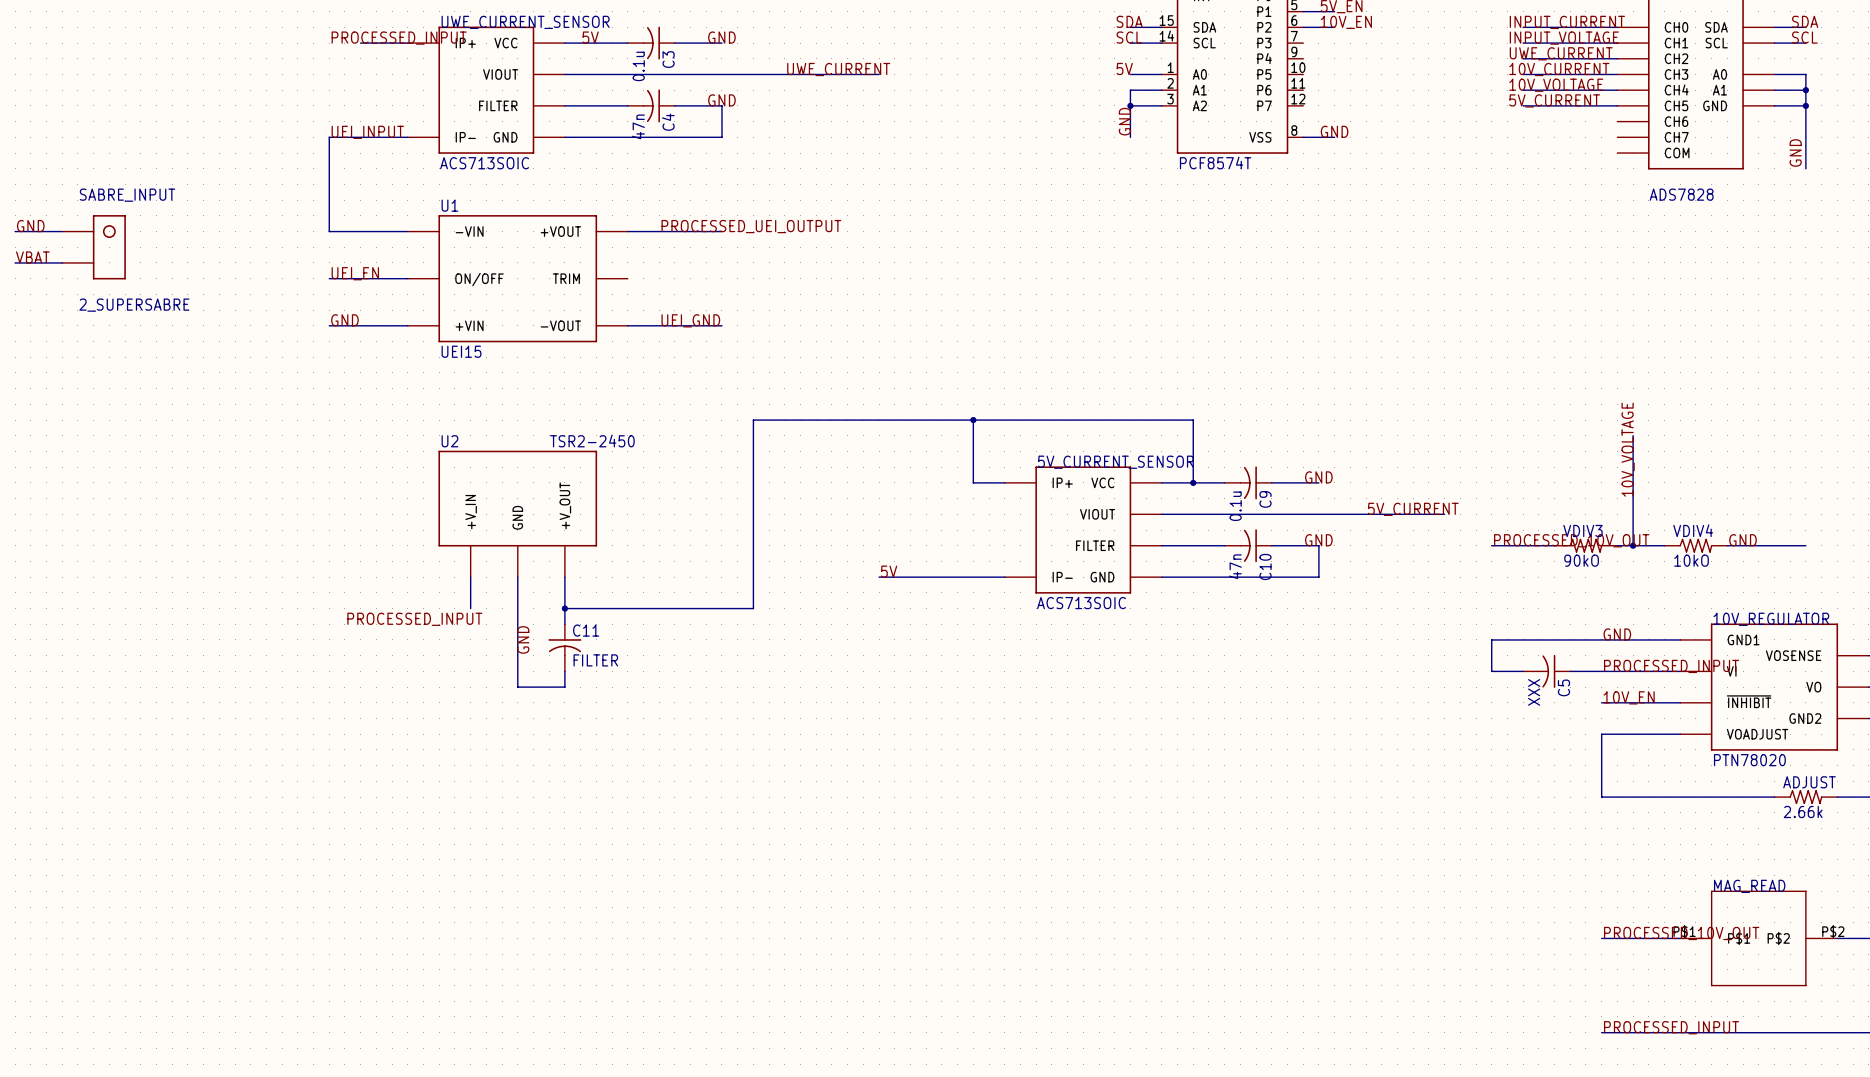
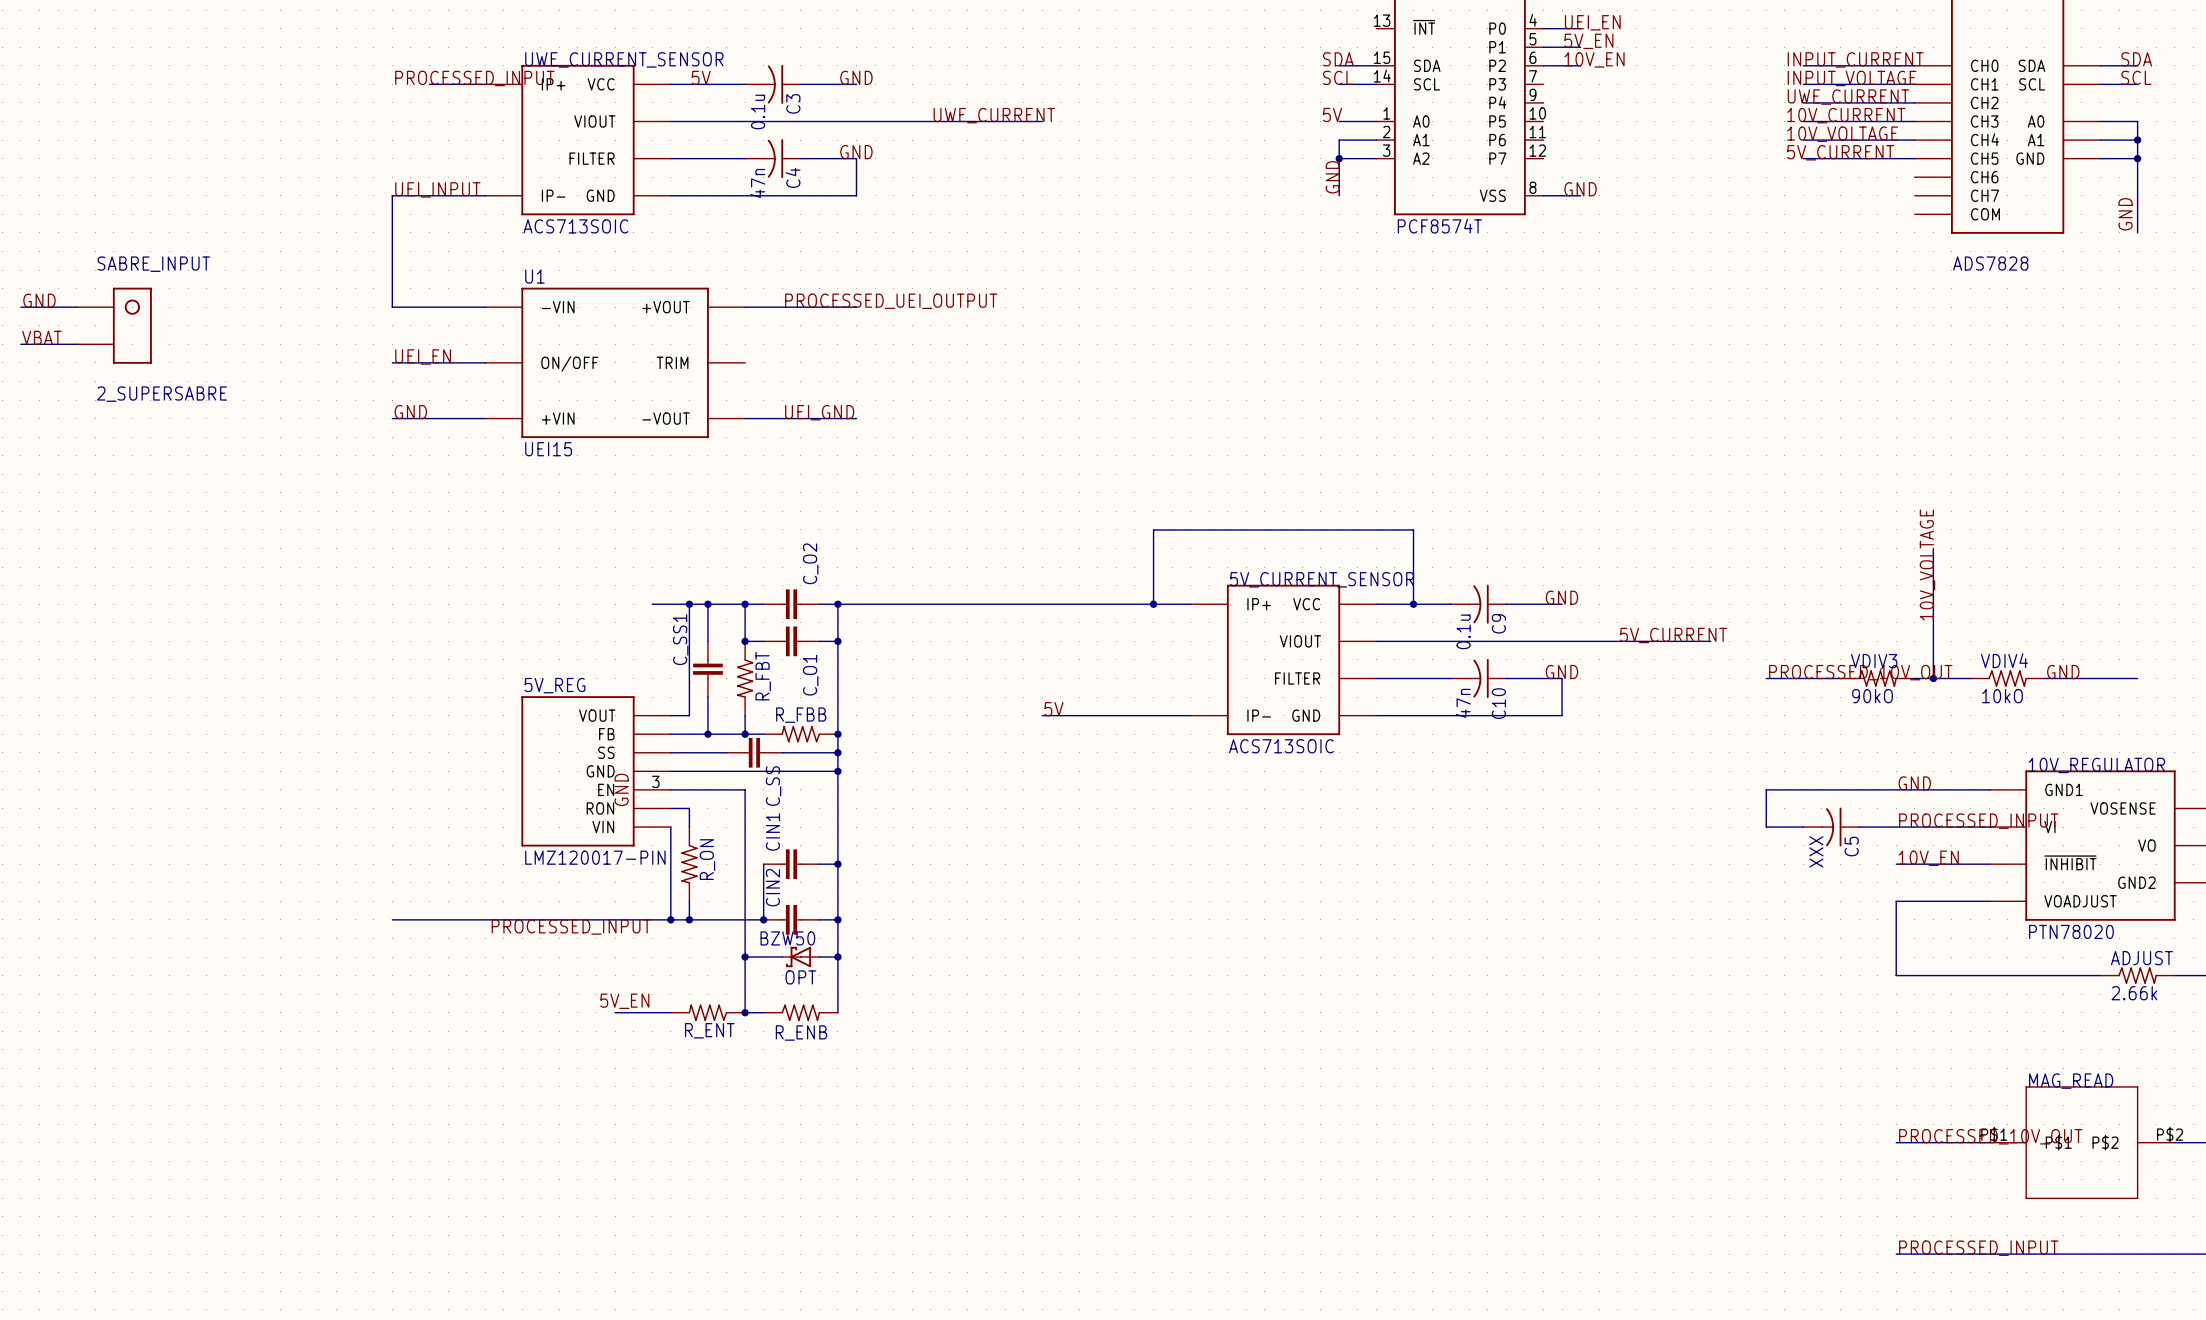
wire: (973, 420) (753, 420) (753, 608) (706, 608) -> none
junction: (973, 420) -> none
wire: none -> (652, 604) (763, 604)
junction: none -> (689, 604)
junction: none -> (707, 604)
wire: none -> (745, 604) (745, 641) (763, 641)
junction: none -> (745, 604)
C_O2: none -> (791, 604)
wire: none -> (819, 604) (1153, 604)
wire: none -> (837, 604) (837, 1012)
junction: none -> (837, 604)
junction: none -> (1153, 604)
U2: TSR2-2450 (517, 513) -> none
junction: none -> (745, 641)
C_O1: none -> (791, 641)
wire: none -> (819, 641) (837, 641)
junction: none -> (837, 641)
C_SS1: none -> (707, 669)
R_FBT: none -> (745, 678)
wire: (470, 577) (470, 608) -> (707, 697) (707, 734)
wire: (517, 577) (517, 687) (564, 687) -> (670, 919) (670, 845)
wire: (564, 577) (564, 624) -> (670, 715) (689, 715) (689, 604)
wire: none -> (745, 715) (745, 734)
wire: none -> (670, 734) (763, 734)
junction: none -> (707, 734)
junction: none -> (745, 734)
R_FBB: none -> (800, 734)
junction: none -> (837, 734)
junction: (564, 608) -> none
C_SS: none -> (754, 752)
junction: none -> (837, 752)
label: PROCESSED_INPUT (414, 619) -> none
5V_REG: none -> LMZ120017-PIN (596, 771)
wire: none -> (670, 771) (837, 771)
junction: none -> (837, 771)
wire: none -> (670, 789) (745, 789) (745, 1012) (763, 1012)
C11: FILTER (564, 647) -> none
wire: none -> (670, 808) (689, 808) (689, 827)
R_ON: none -> (689, 864)
wire: none -> (763, 864) (763, 919) (392, 919)
CIN1: none -> (791, 864)
wire: none -> (819, 864) (837, 864)
junction: none -> (837, 864)
wire: none -> (689, 901) (689, 919)
junction: none -> (670, 919)
junction: none -> (689, 919)
junction: none -> (763, 919)
CIN2: none -> (791, 919)
wire: none -> (819, 919) (837, 919)
junction: none -> (837, 919)
label: none -> PROCESSED_INPUT (571, 926)
wire: none -> (745, 957) (782, 957)
junction: none -> (745, 957)
OPT: none -> BZW50 (800, 957)
wire: none -> (819, 957) (837, 957)
junction: none -> (837, 957)
label: none -> 5V_EN (624, 1001)
wire: none -> (615, 1012) (670, 1012)
R_ENT: none -> (707, 1012)
junction: none -> (745, 1012)
R_ENB: none -> (800, 1012)

